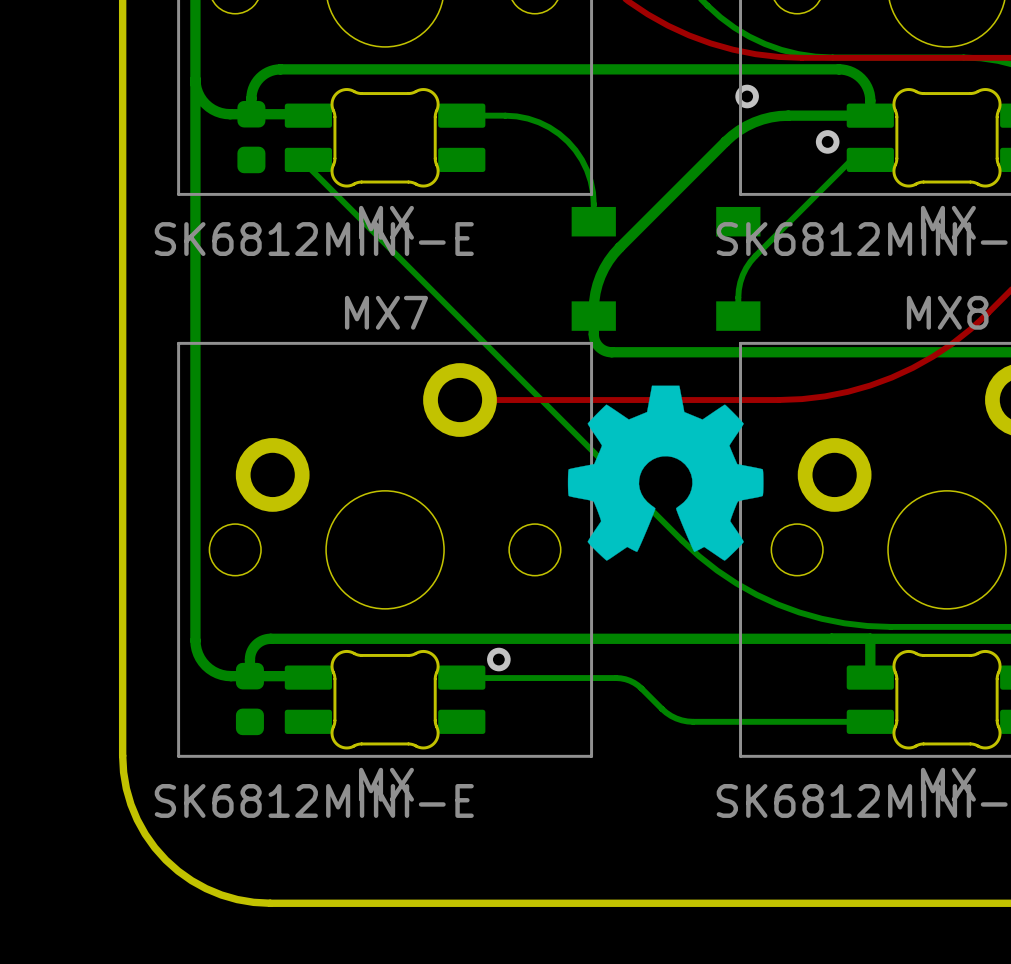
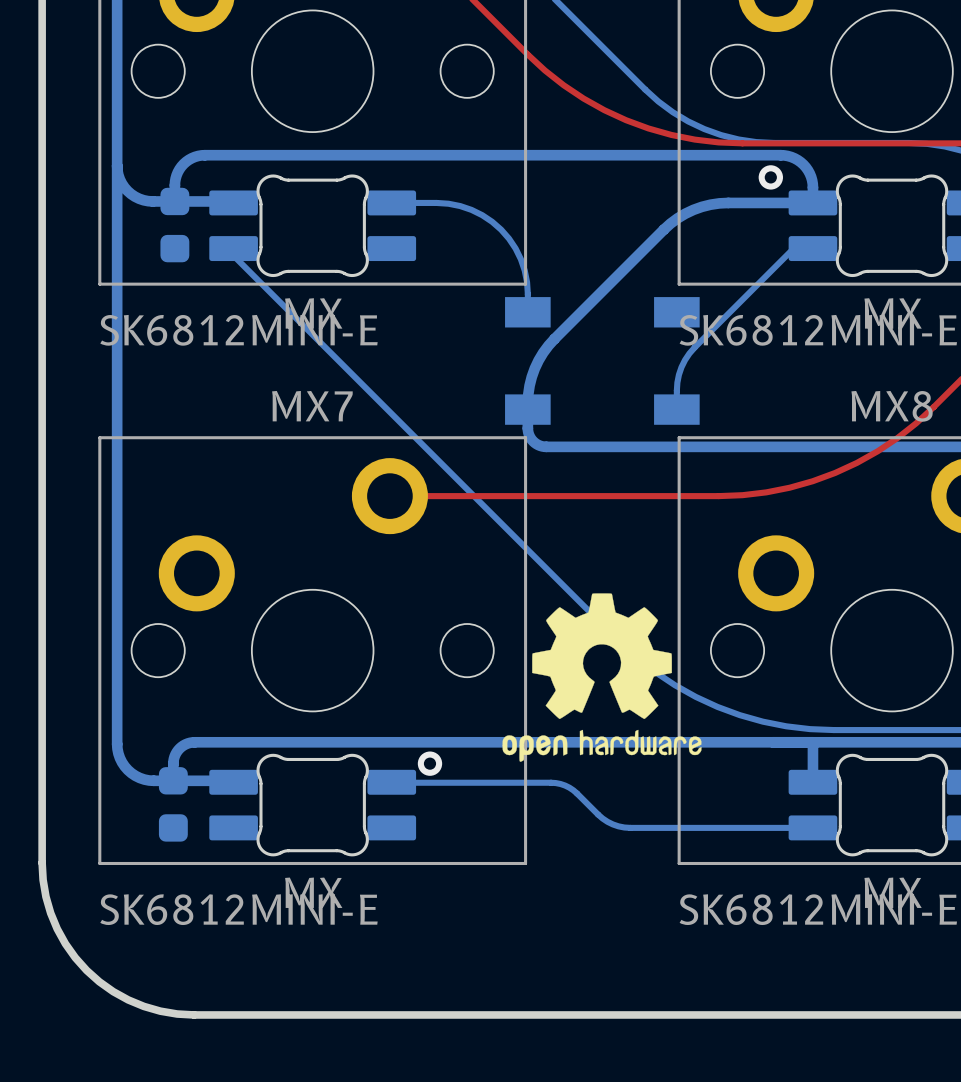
via: none -> (770, 177)
via: (747, 96) -> none
via: (827, 141) -> none
drawing: [567, 385, 764, 561] -> none
drawing: none -> [502, 593, 702, 762]

